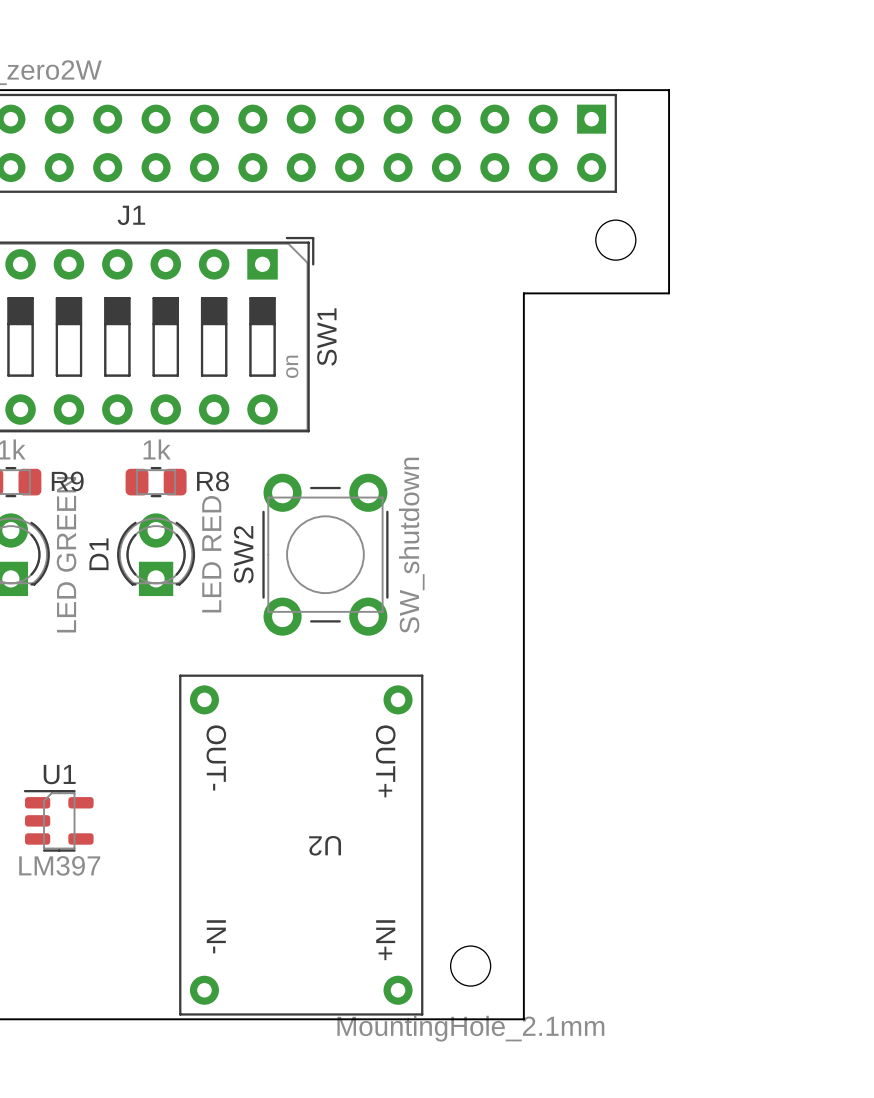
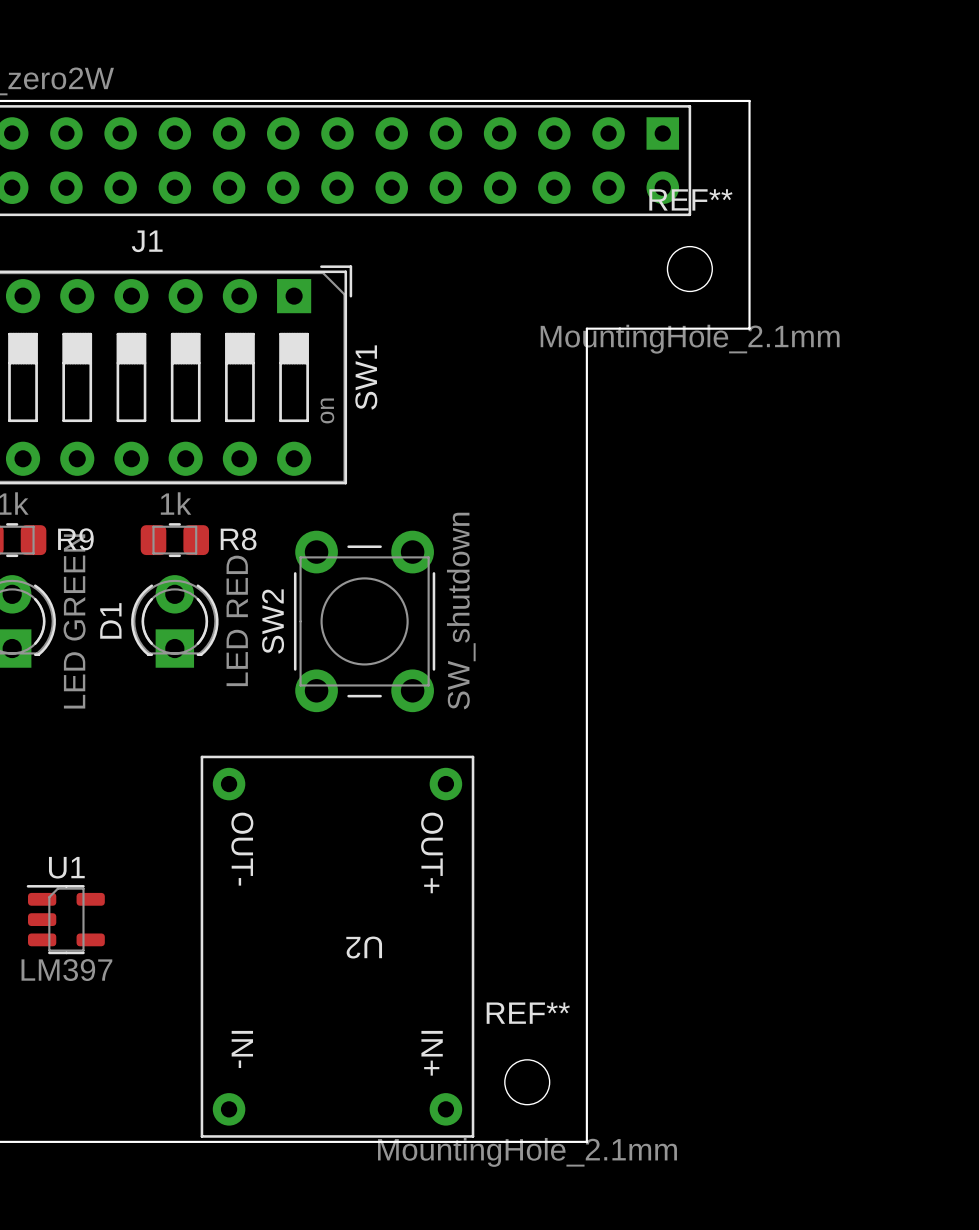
REF** name: none -> REF** (690, 199)
REF** value: none -> MountingHole_2.1mm (690, 339)
REF** name: none -> REF** (528, 1013)

